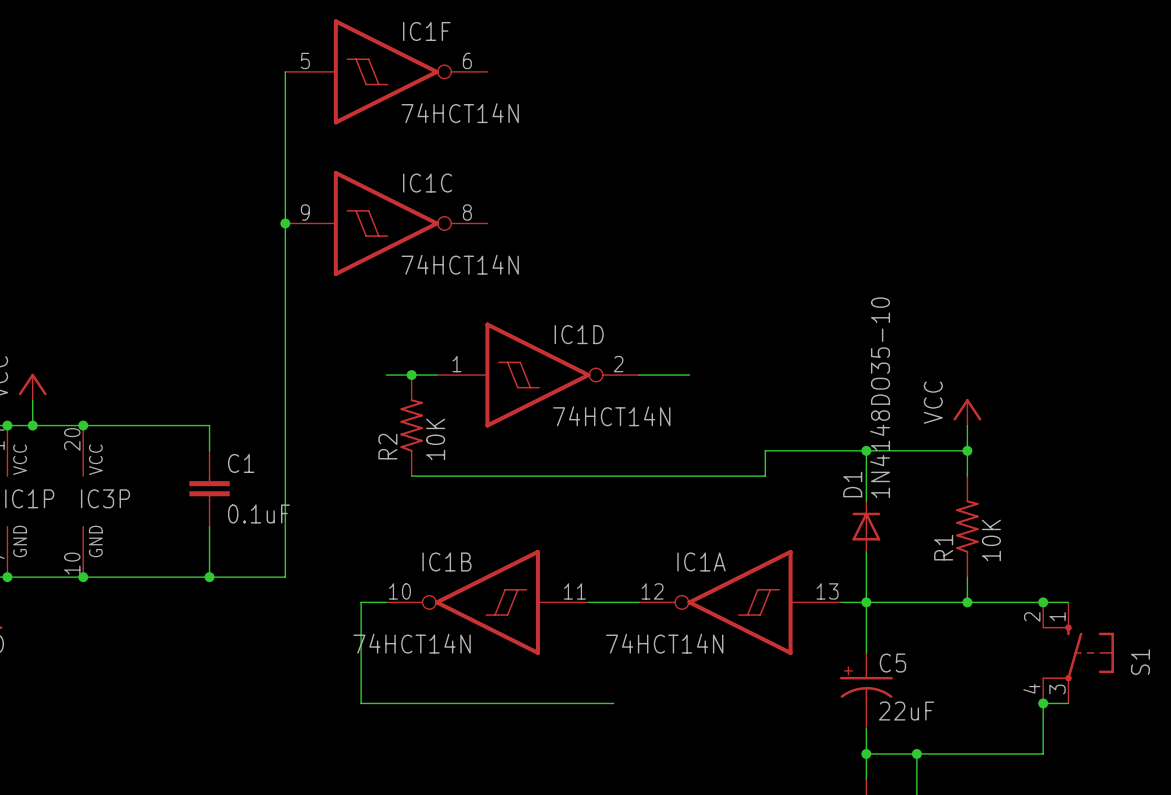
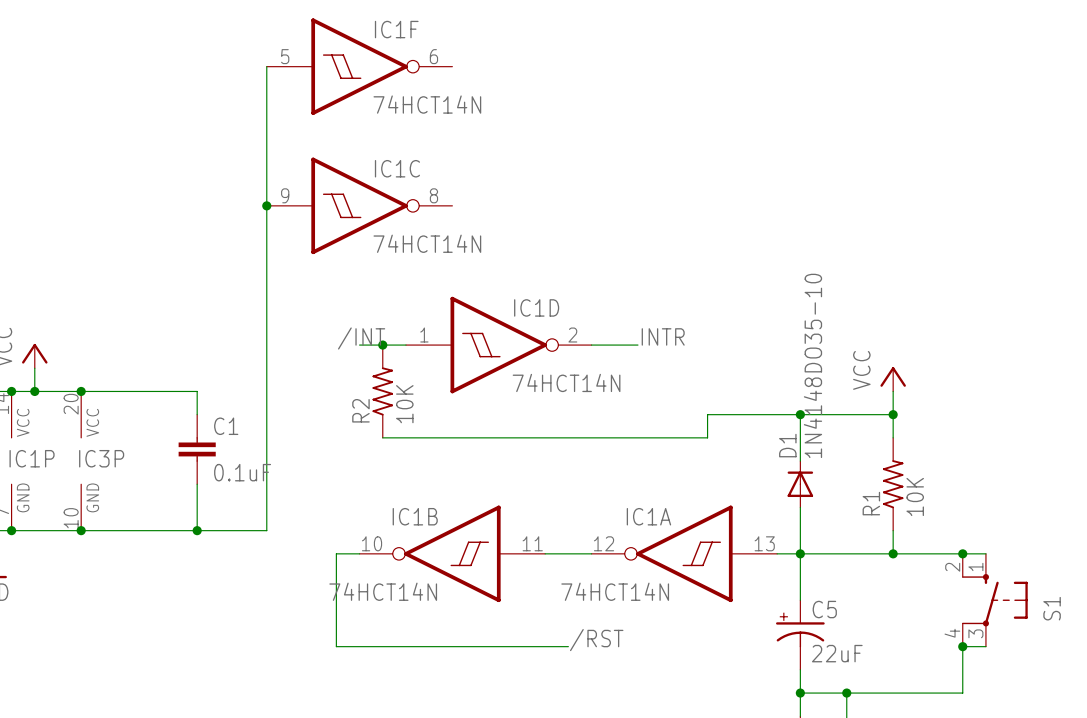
label: none -> INTR (663, 336)
label: none -> /INT (361, 338)
label: none -> /RST (596, 640)

